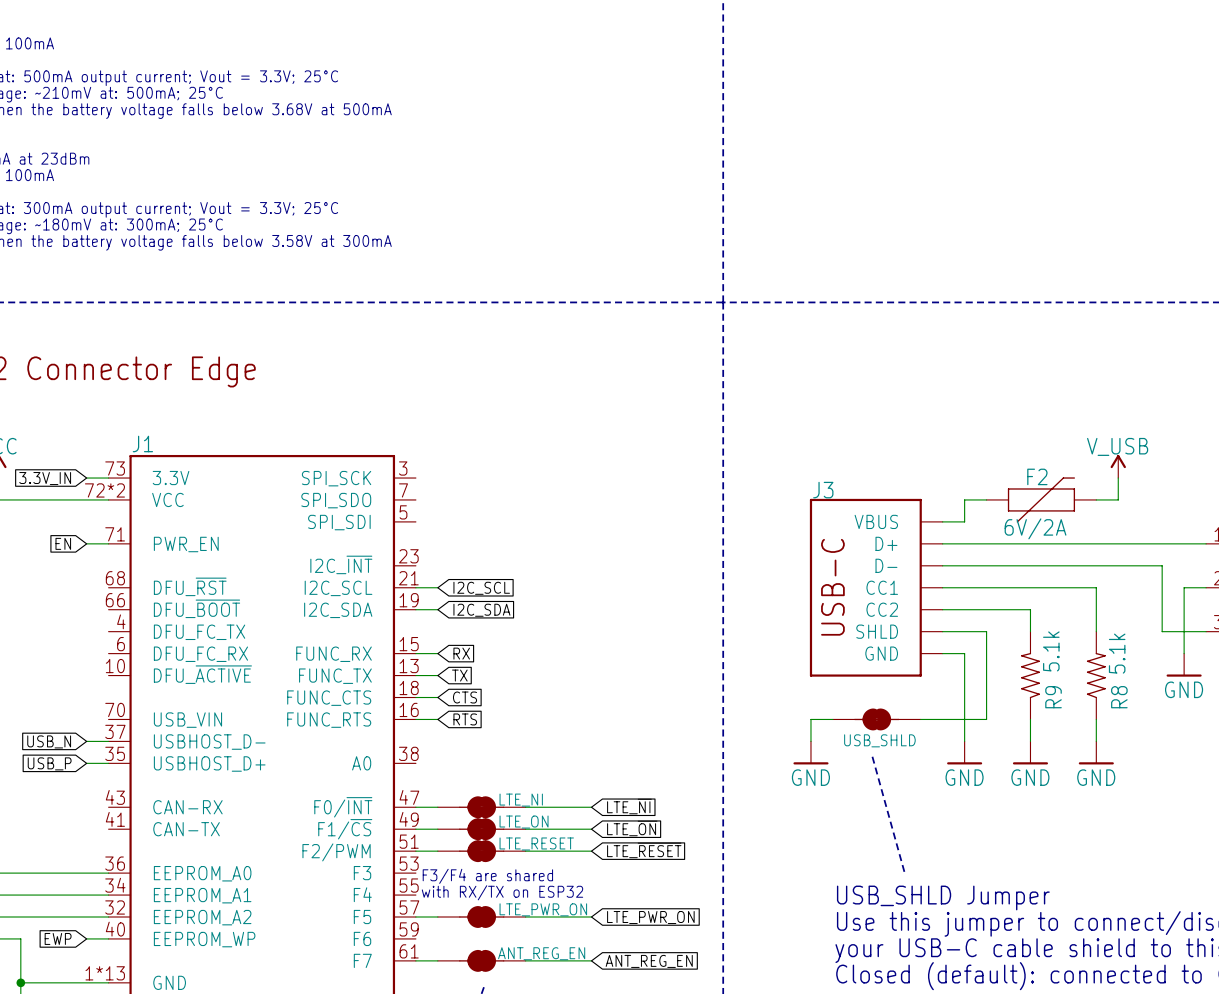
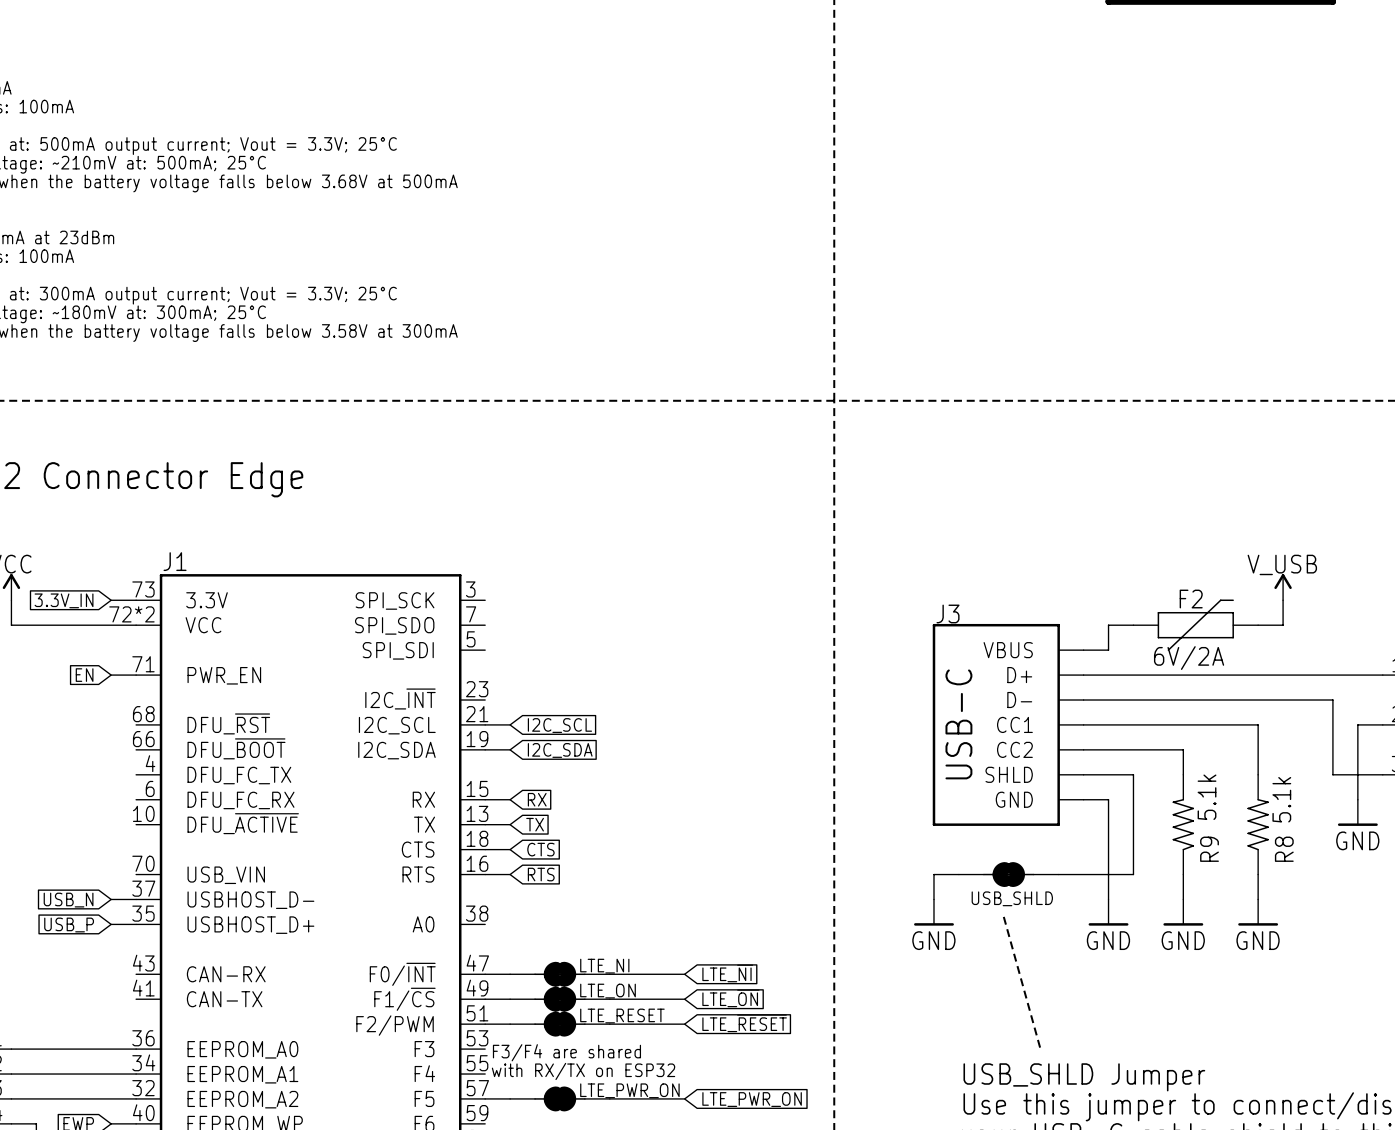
J1 pin name: FUNC_RX (334, 654) -> RX (423, 799)
J1 pin name: FUNC_TX (335, 676) -> TX (424, 824)
J1 pin name: FUNC_CTS (329, 698) -> CTS (418, 849)
J1 pin name: FUNC_RTS (329, 720) -> RTS (418, 874)

